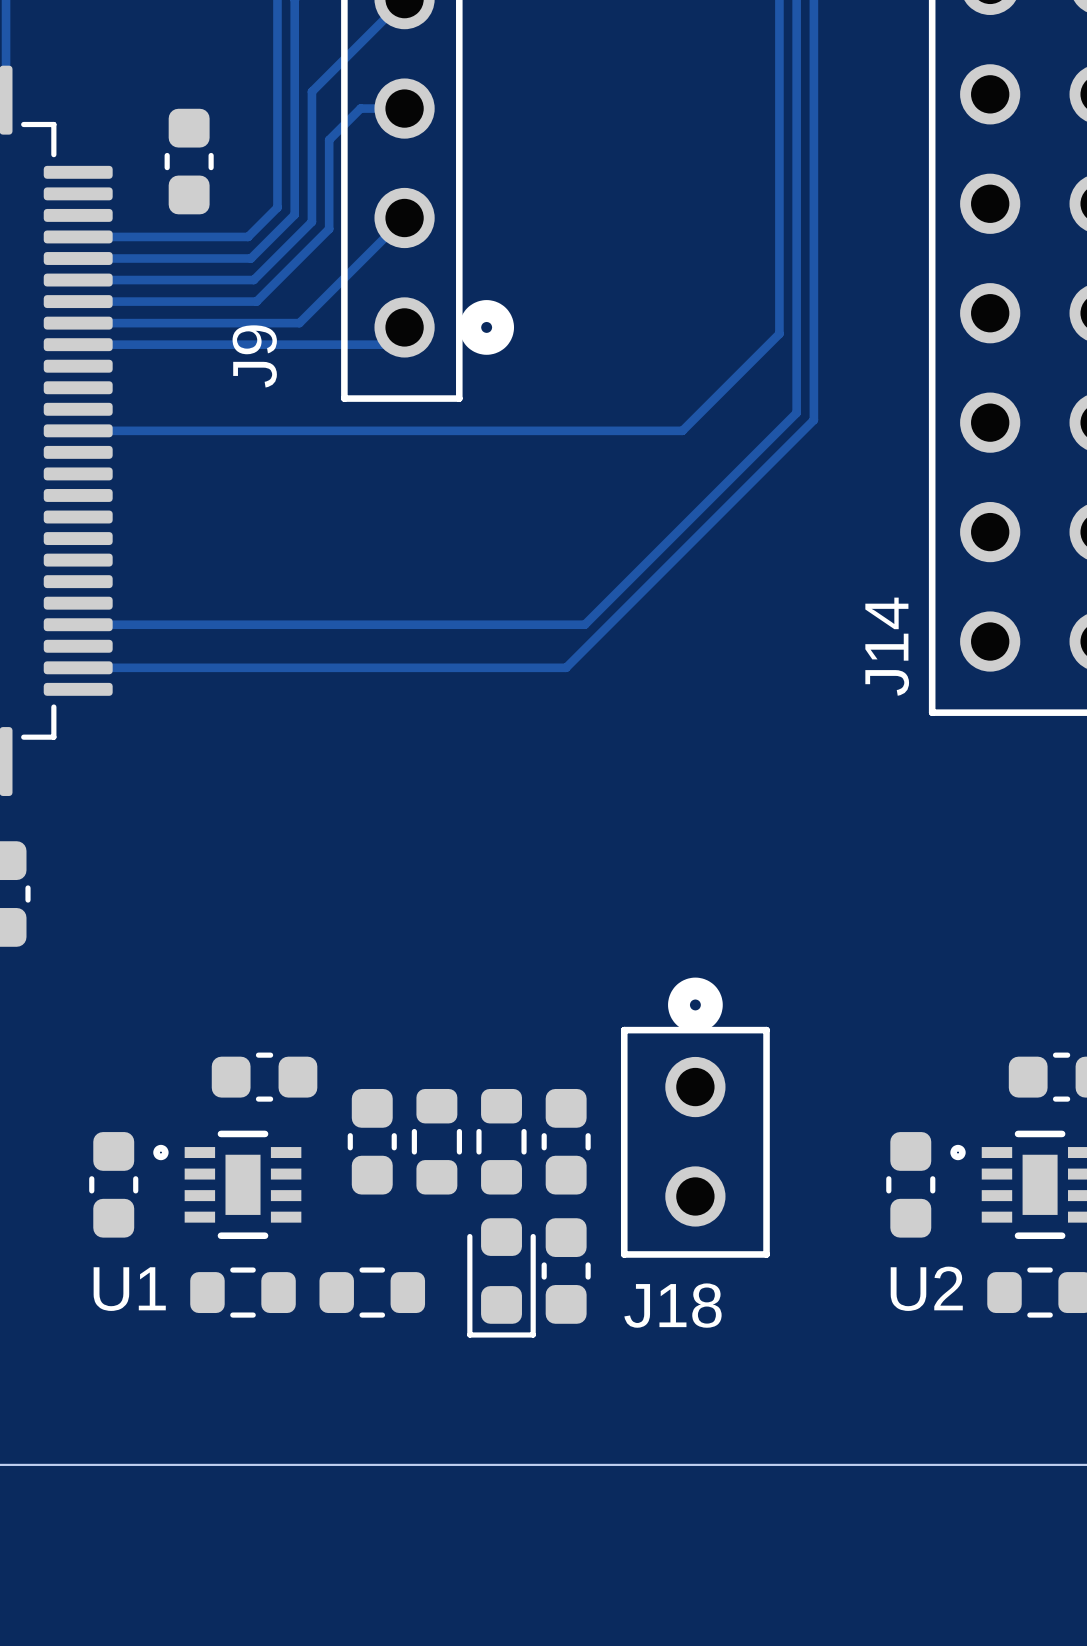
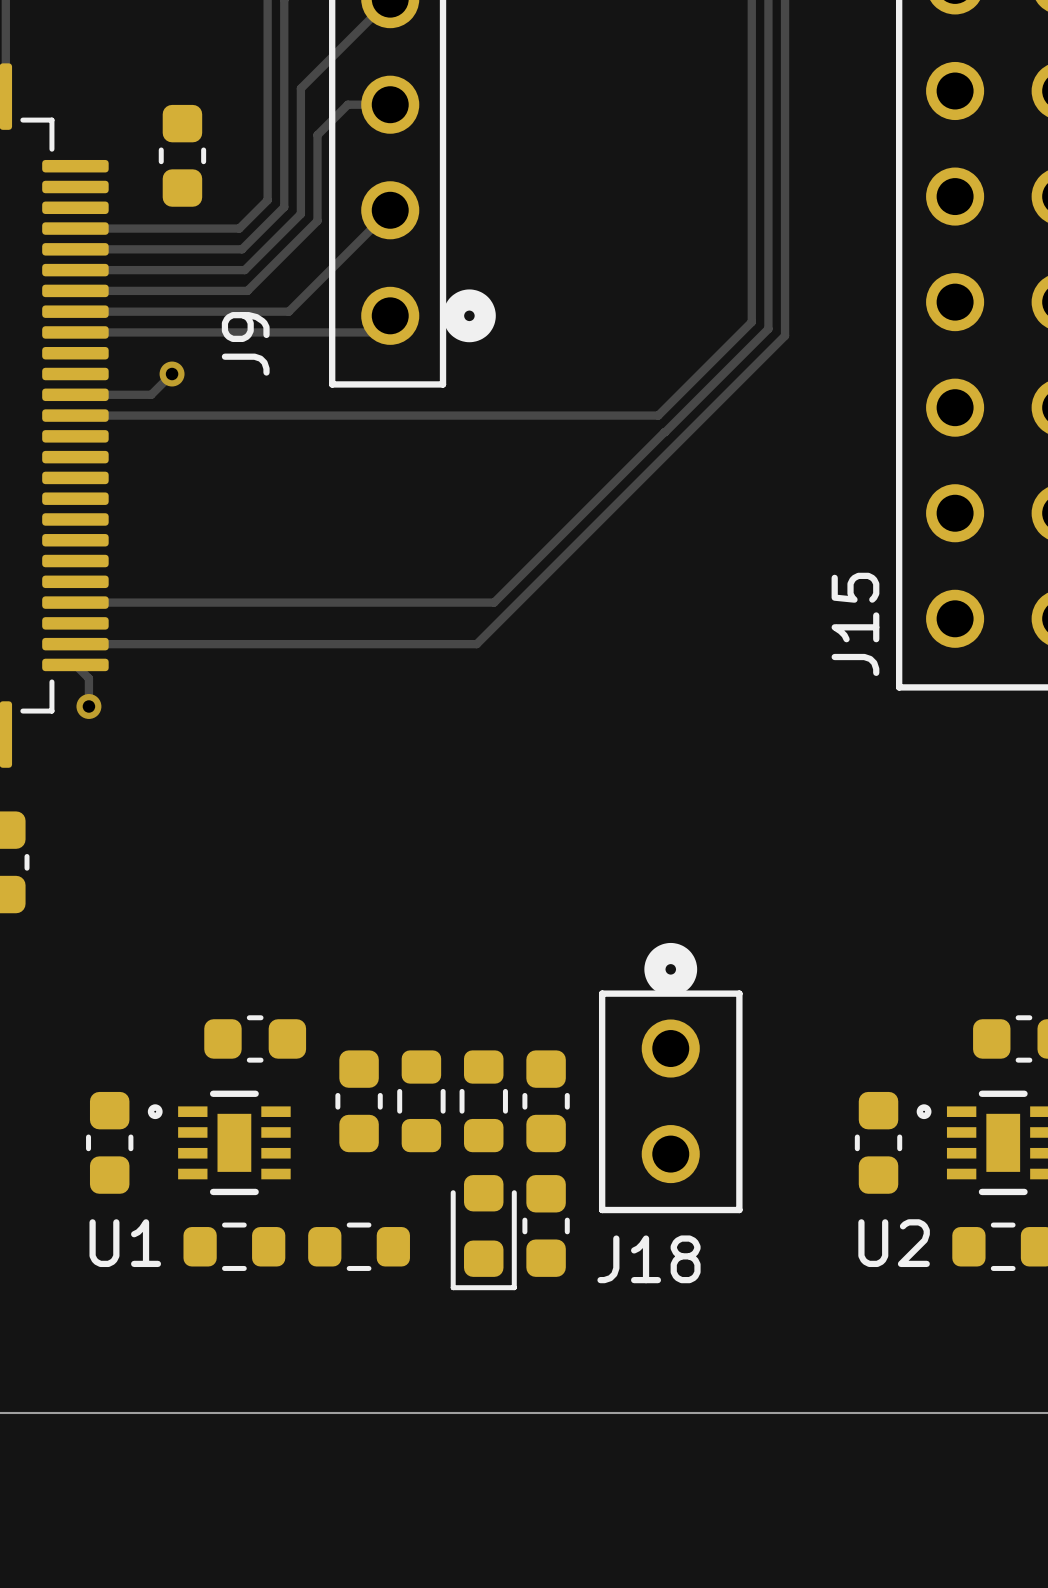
track: (796, 341) (796, 412) (584, 624) (512, 624) -> (664, 432) (494, 602)
track: none -> (768, 328) (665, 432)
track: (813, 348) (813, 420) (566, 667) (494, 667) -> (785, 335) (476, 644)
track: none -> (172, 374) (151, 394) (75, 394)
via: none -> (172, 374)
J14 name: J14 (887, 646) -> J15 (855, 624)
track: none -> (75, 664) (88, 678) (88, 706)
via: none -> (88, 706)

